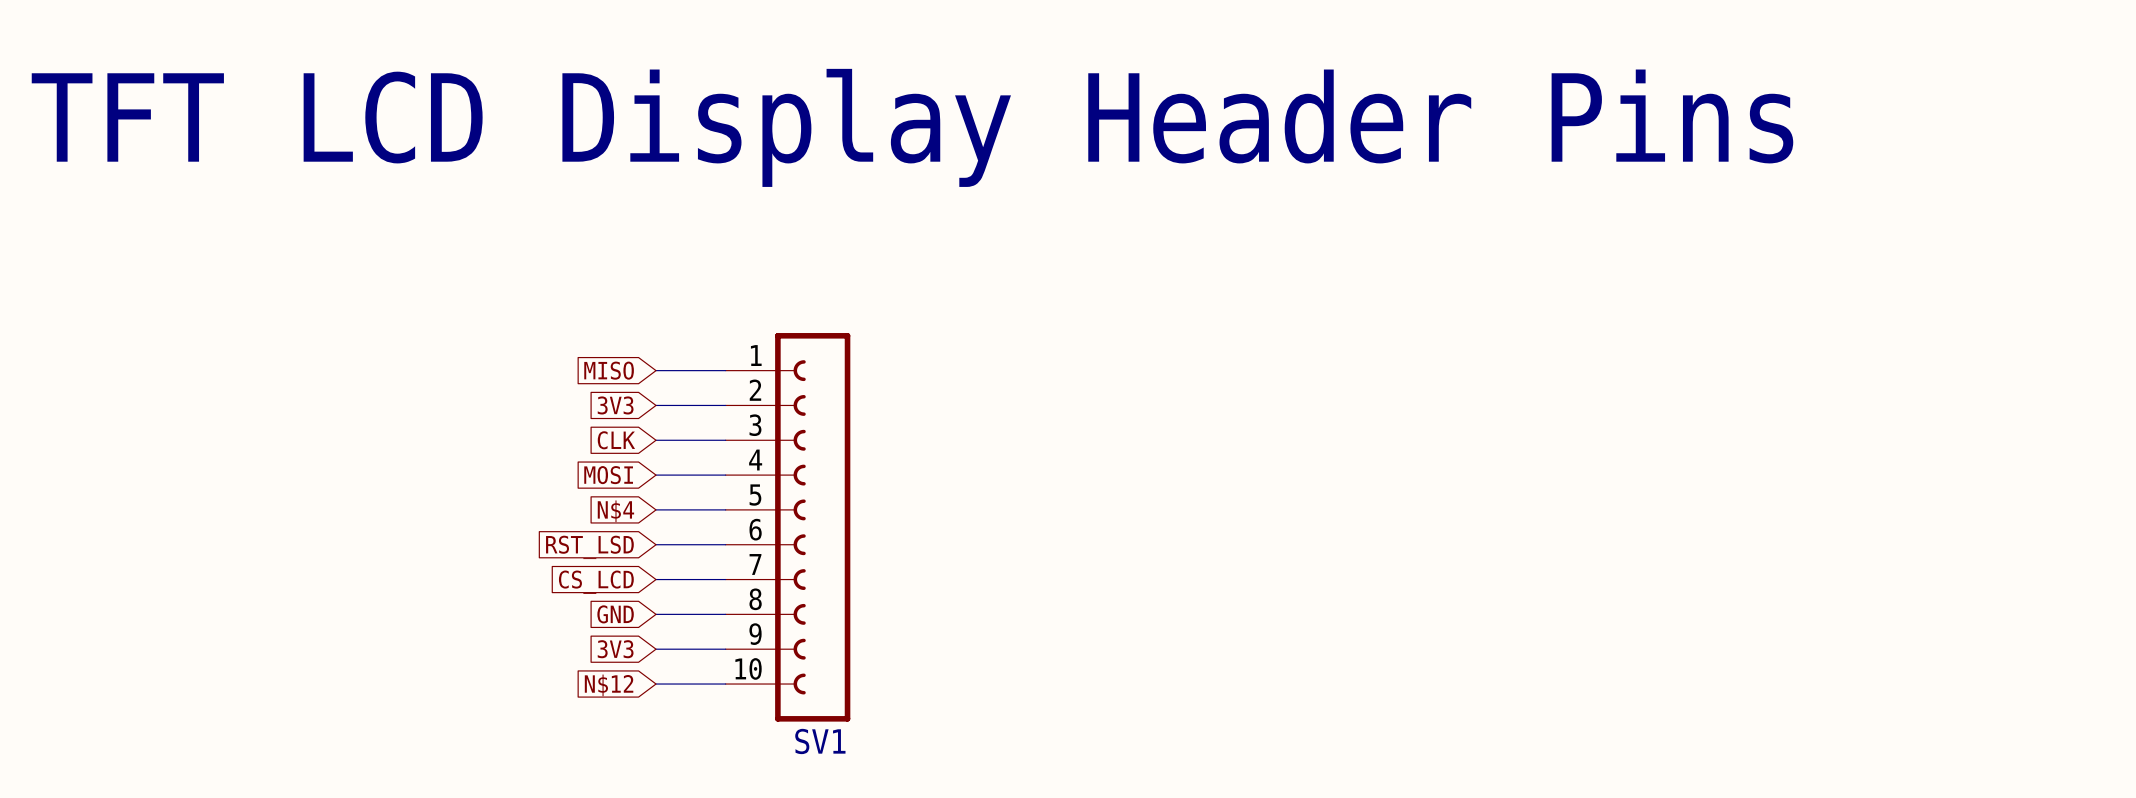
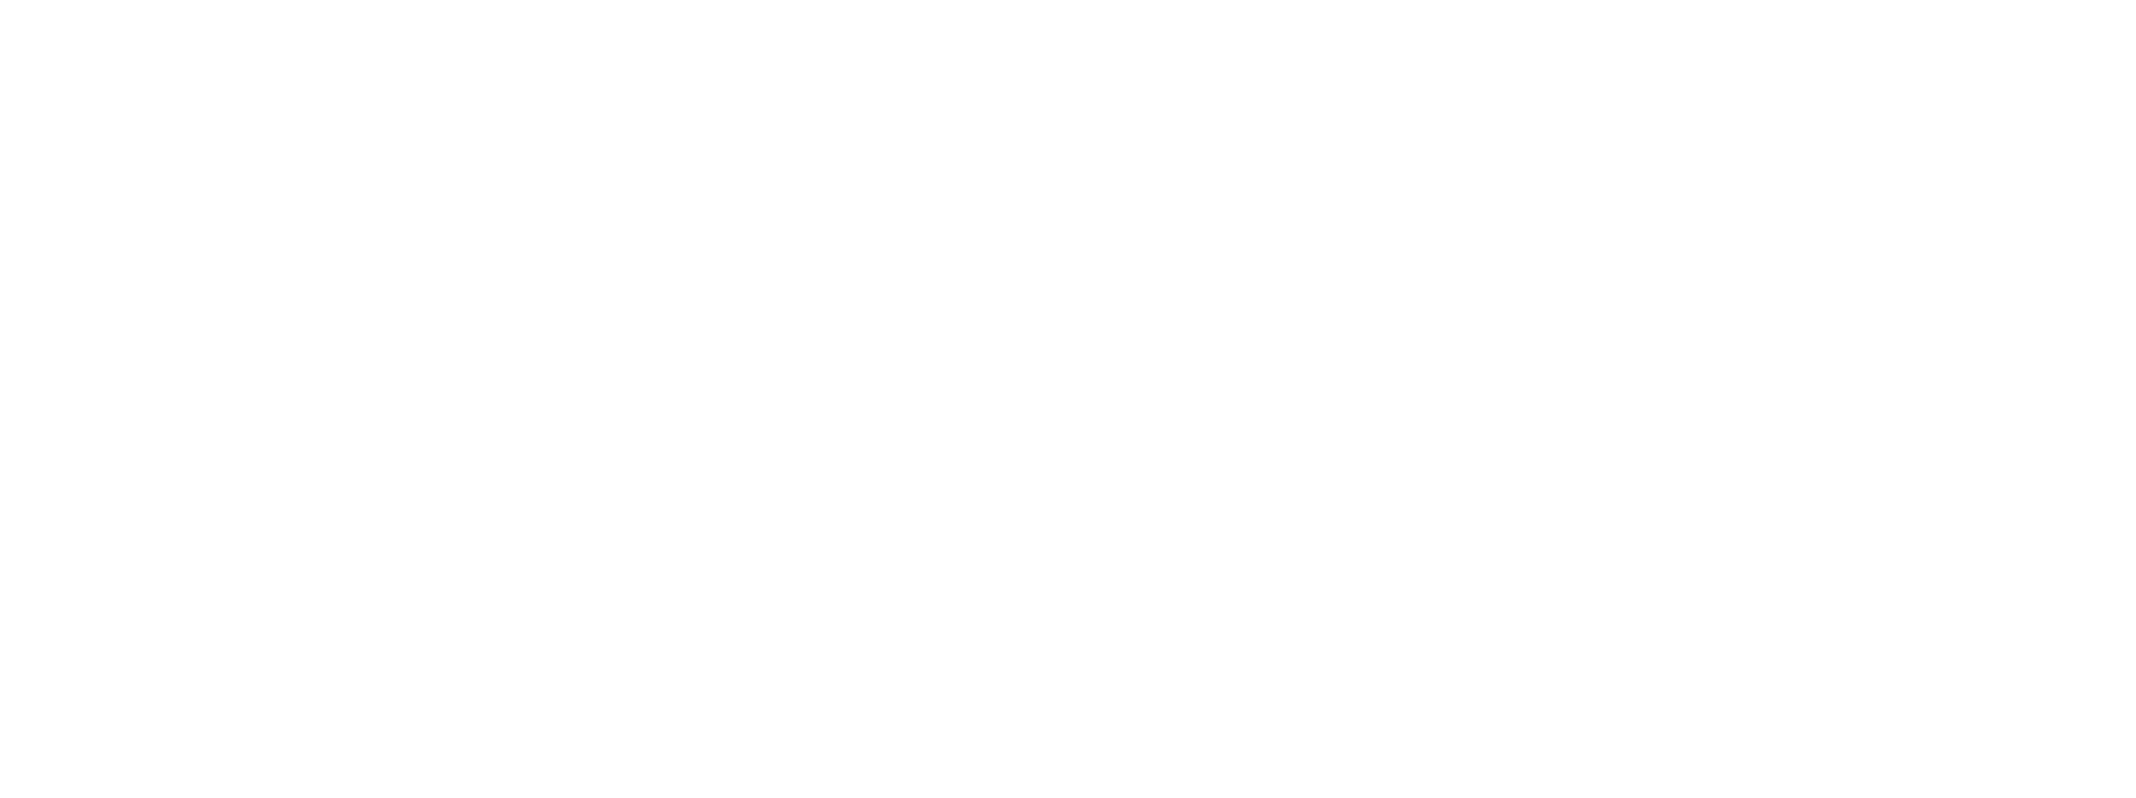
text: TFT LCD Display Header Pins (912, 127) -> none
global label: MISO (609, 370) -> none
wire: (656, 370) (725, 370) -> none
global label: 3V3 (615, 405) -> none
wire: (656, 405) (725, 405) -> none
global label: CLK (616, 440) -> none
wire: (656, 440) (725, 440) -> none
global label: MOSI (608, 475) -> none
wire: (656, 475) (725, 475) -> none
wire: (656, 509) (725, 509) -> none
global label: N$4 (615, 511) -> none
SV1: (787, 527) -> none
wire: (656, 544) (725, 544) -> none
global label: RST_LSD (589, 547) -> none
wire: (656, 579) (725, 579) -> none
global label: CS_LCD (596, 582) -> none
global label: GND (615, 614) -> none
wire: (656, 614) (725, 614) -> none
global label: 3V3 (615, 649) -> none
wire: (656, 649) (725, 649) -> none
wire: (656, 684) (725, 684) -> none
global label: N$12 (609, 685) -> none

